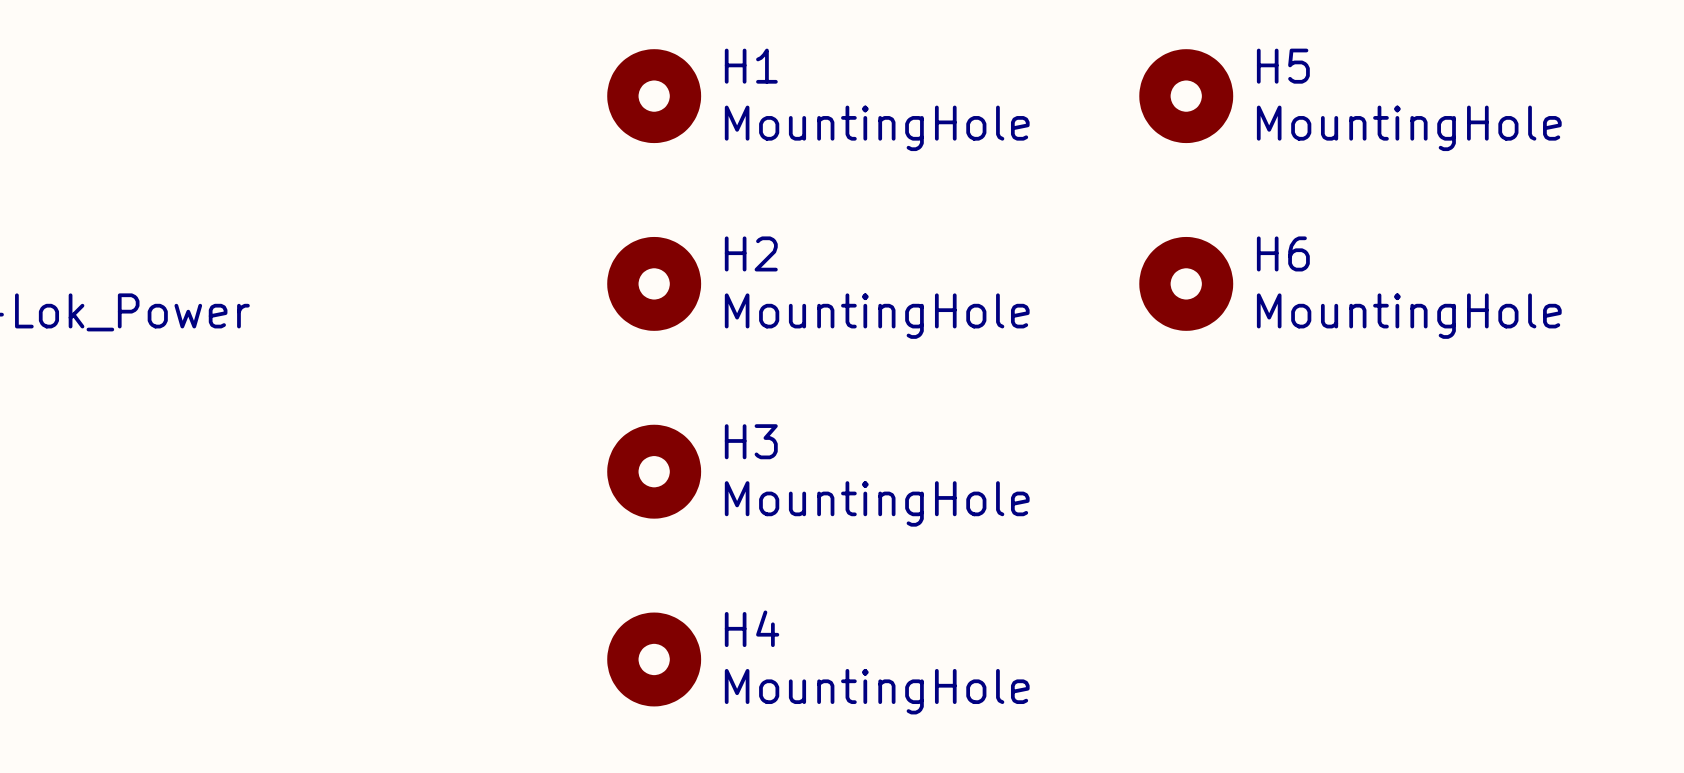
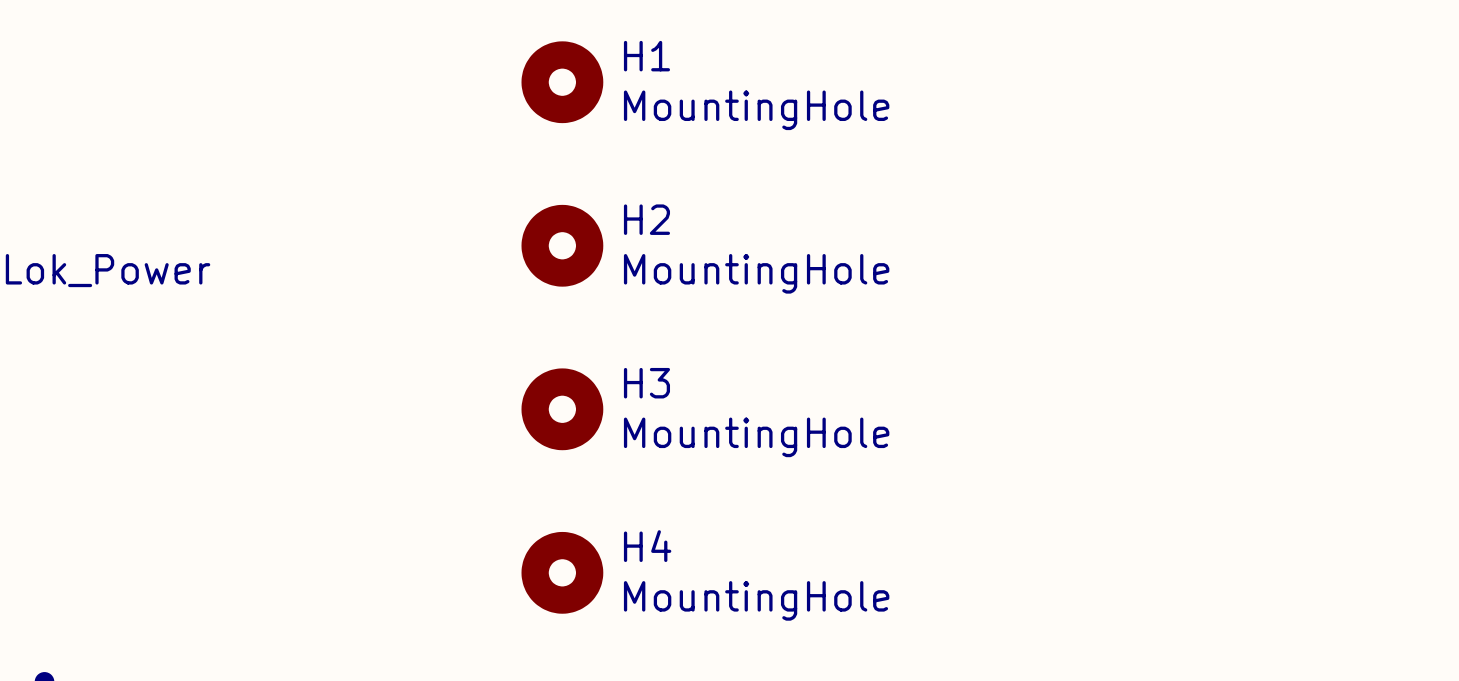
H5: MountingHole (1186, 96) -> none
H6: MountingHole (1186, 283) -> none

